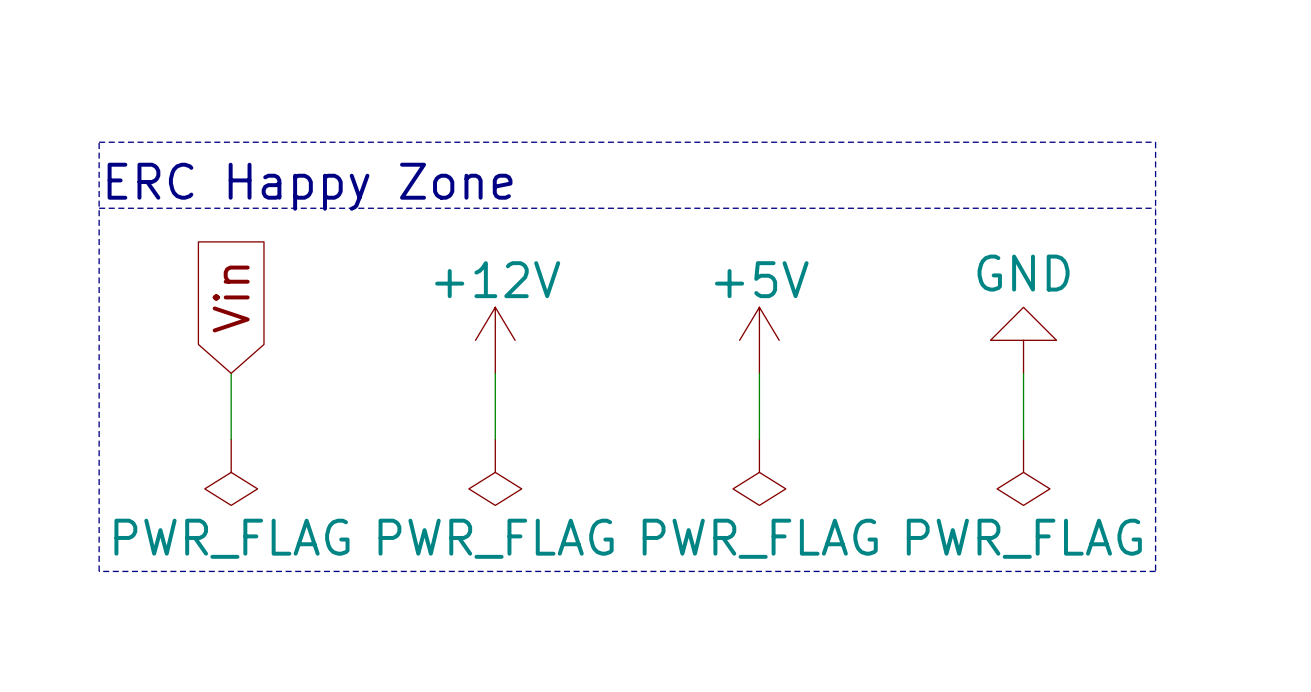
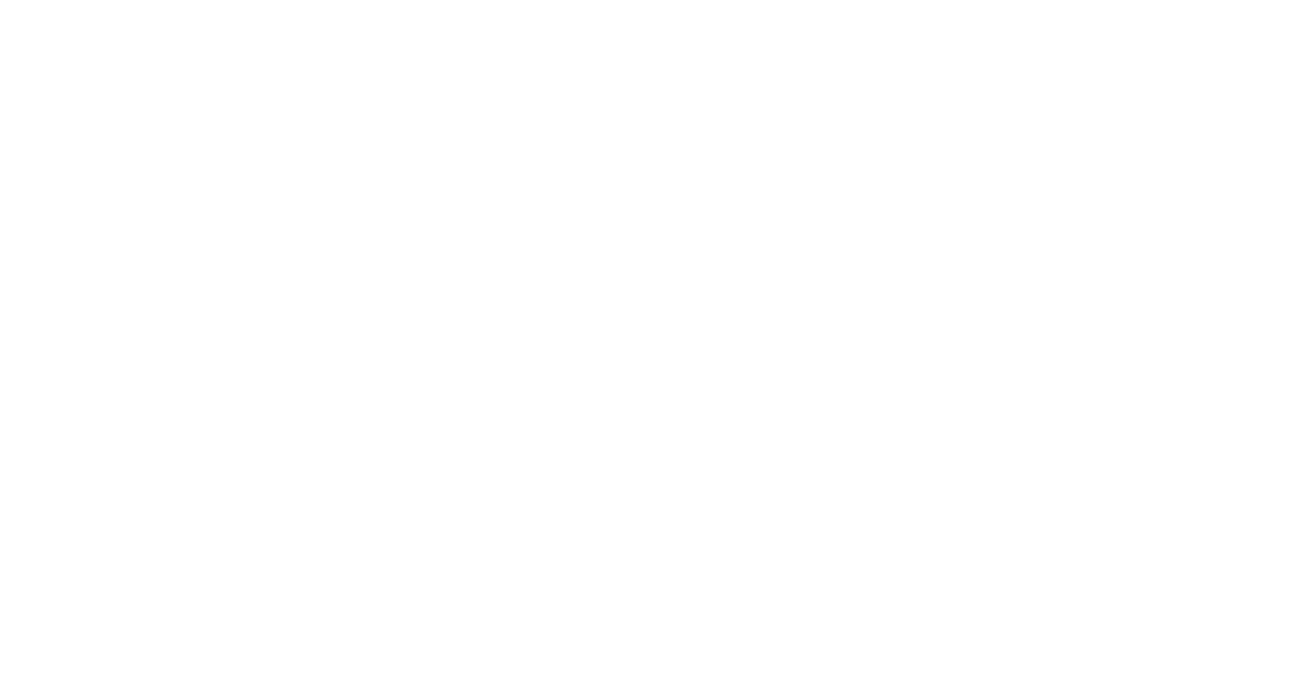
line: (99, 142) (99, 571) (1155, 571) (1155, 142) (99, 142) -> none
text: ERC Happy Zone (310, 186) -> none
line: (99, 208) (1155, 208) -> none
global label: Vin (231, 299) -> none
power symbol: +12V (495, 340) -> none
power symbol: +5V (759, 340) -> none
power symbol: GND (1023, 340) -> none
wire: (231, 373) (231, 439) -> none
wire: (495, 373) (495, 439) -> none
wire: (759, 373) (759, 439) -> none
wire: (1023, 373) (1023, 439) -> none
power symbol: PWR_FLAG (231, 472) -> none
power symbol: PWR_FLAG (495, 472) -> none
power symbol: PWR_FLAG (759, 472) -> none
power symbol: PWR_FLAG (1023, 472) -> none

